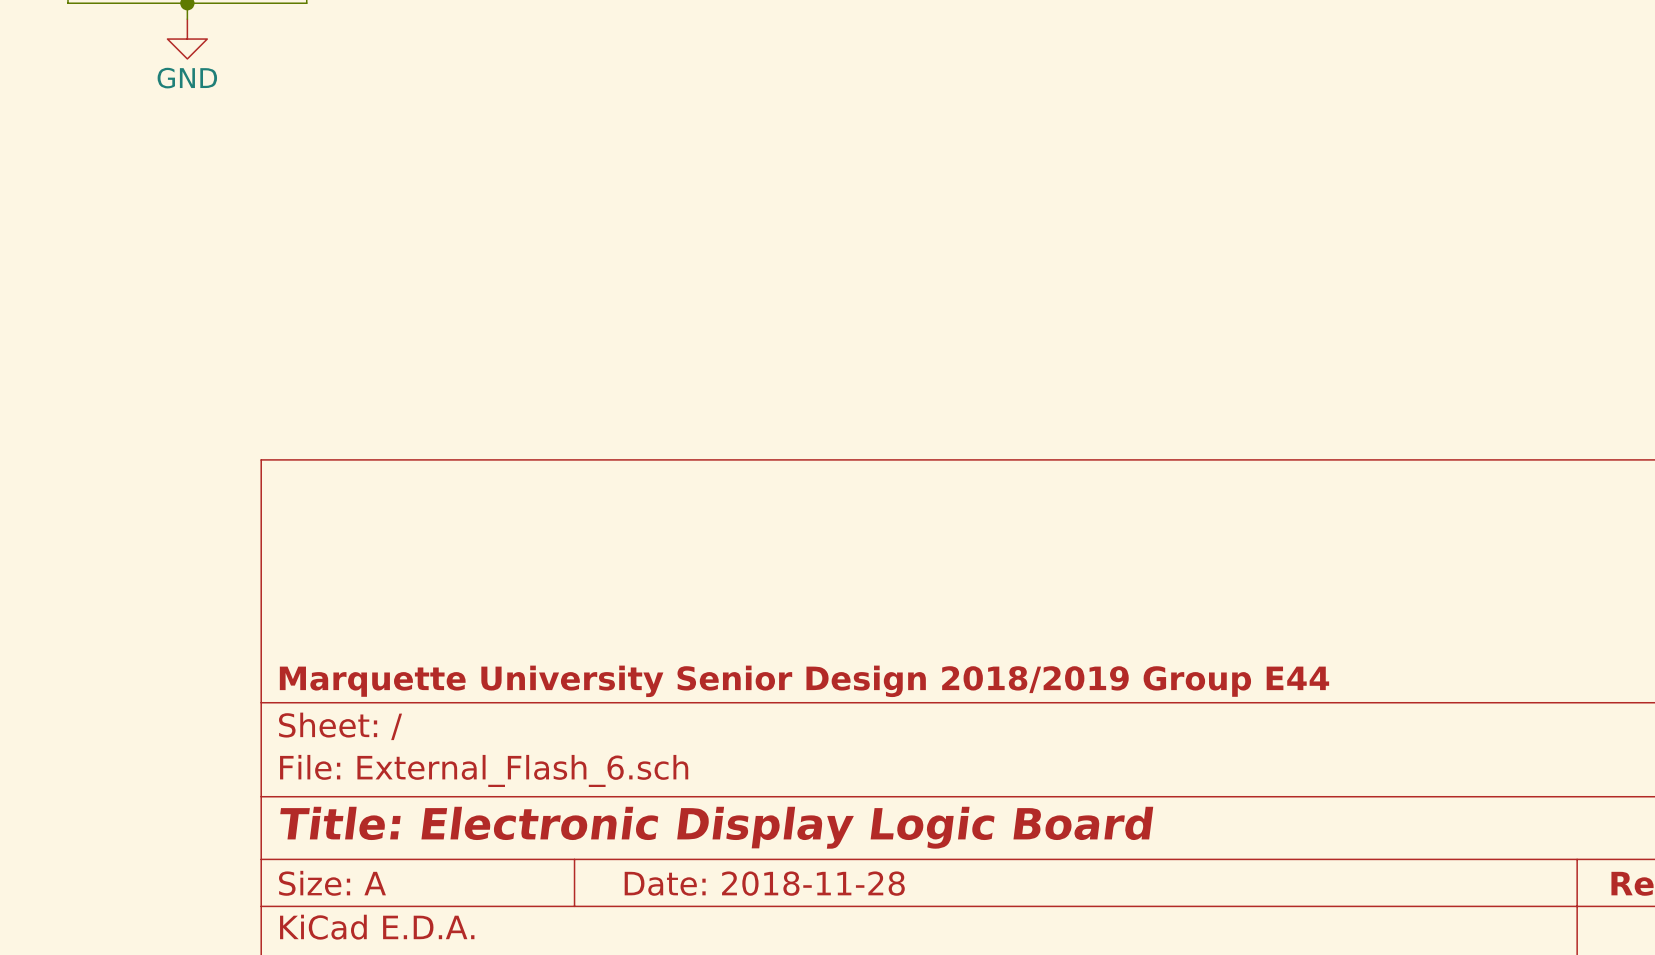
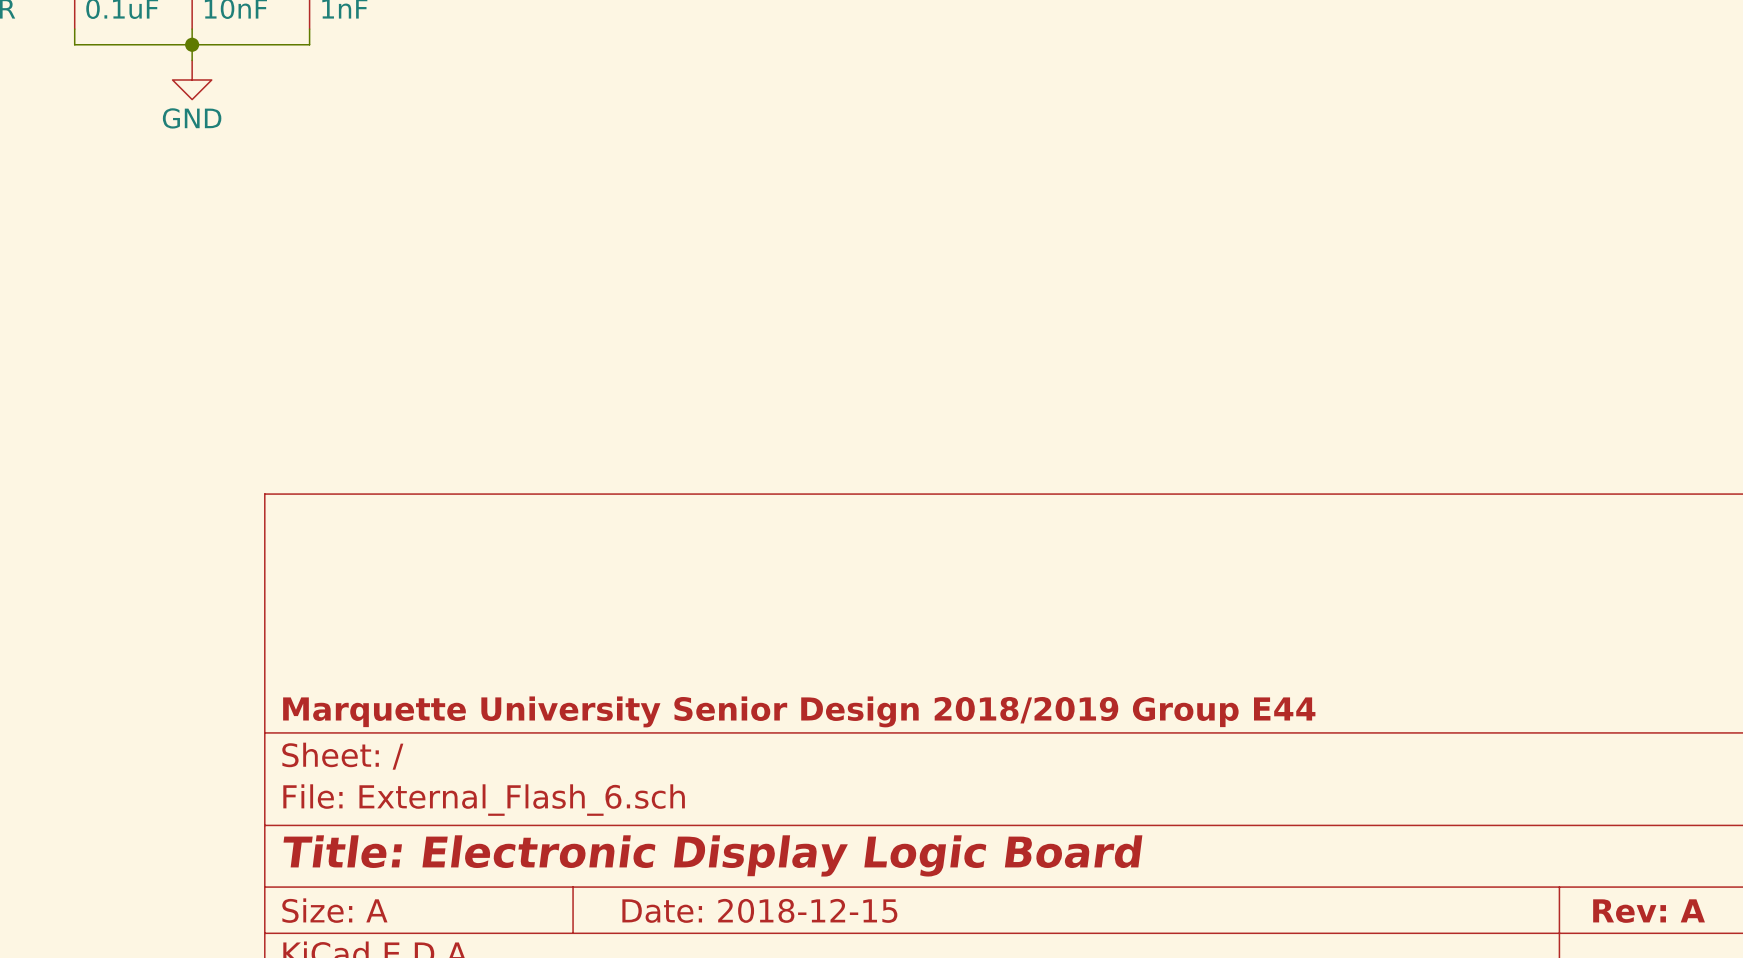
title block: Date: 2018-11-28 (764, 883) -> Date: 2018-12-15 (759, 910)

